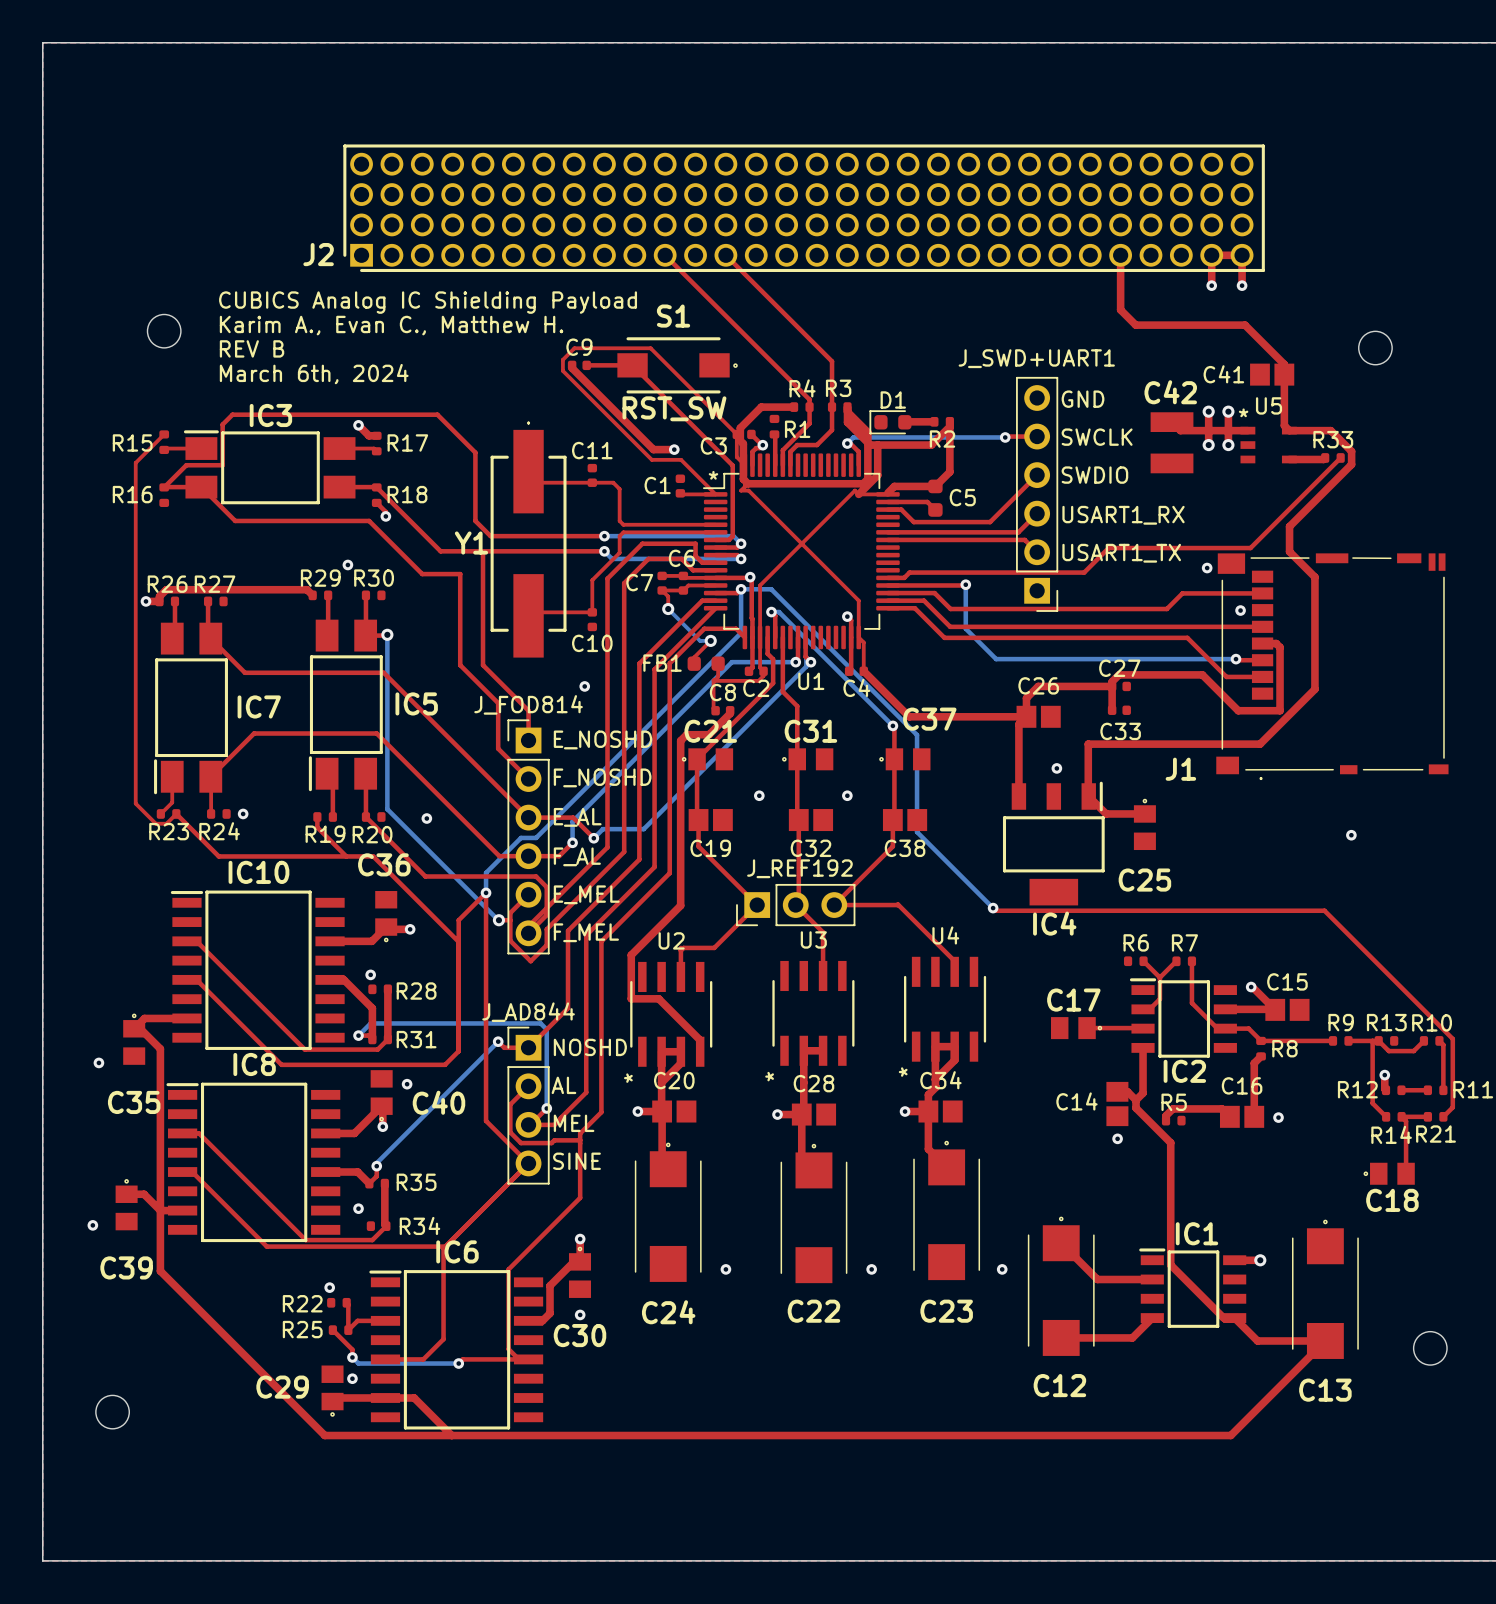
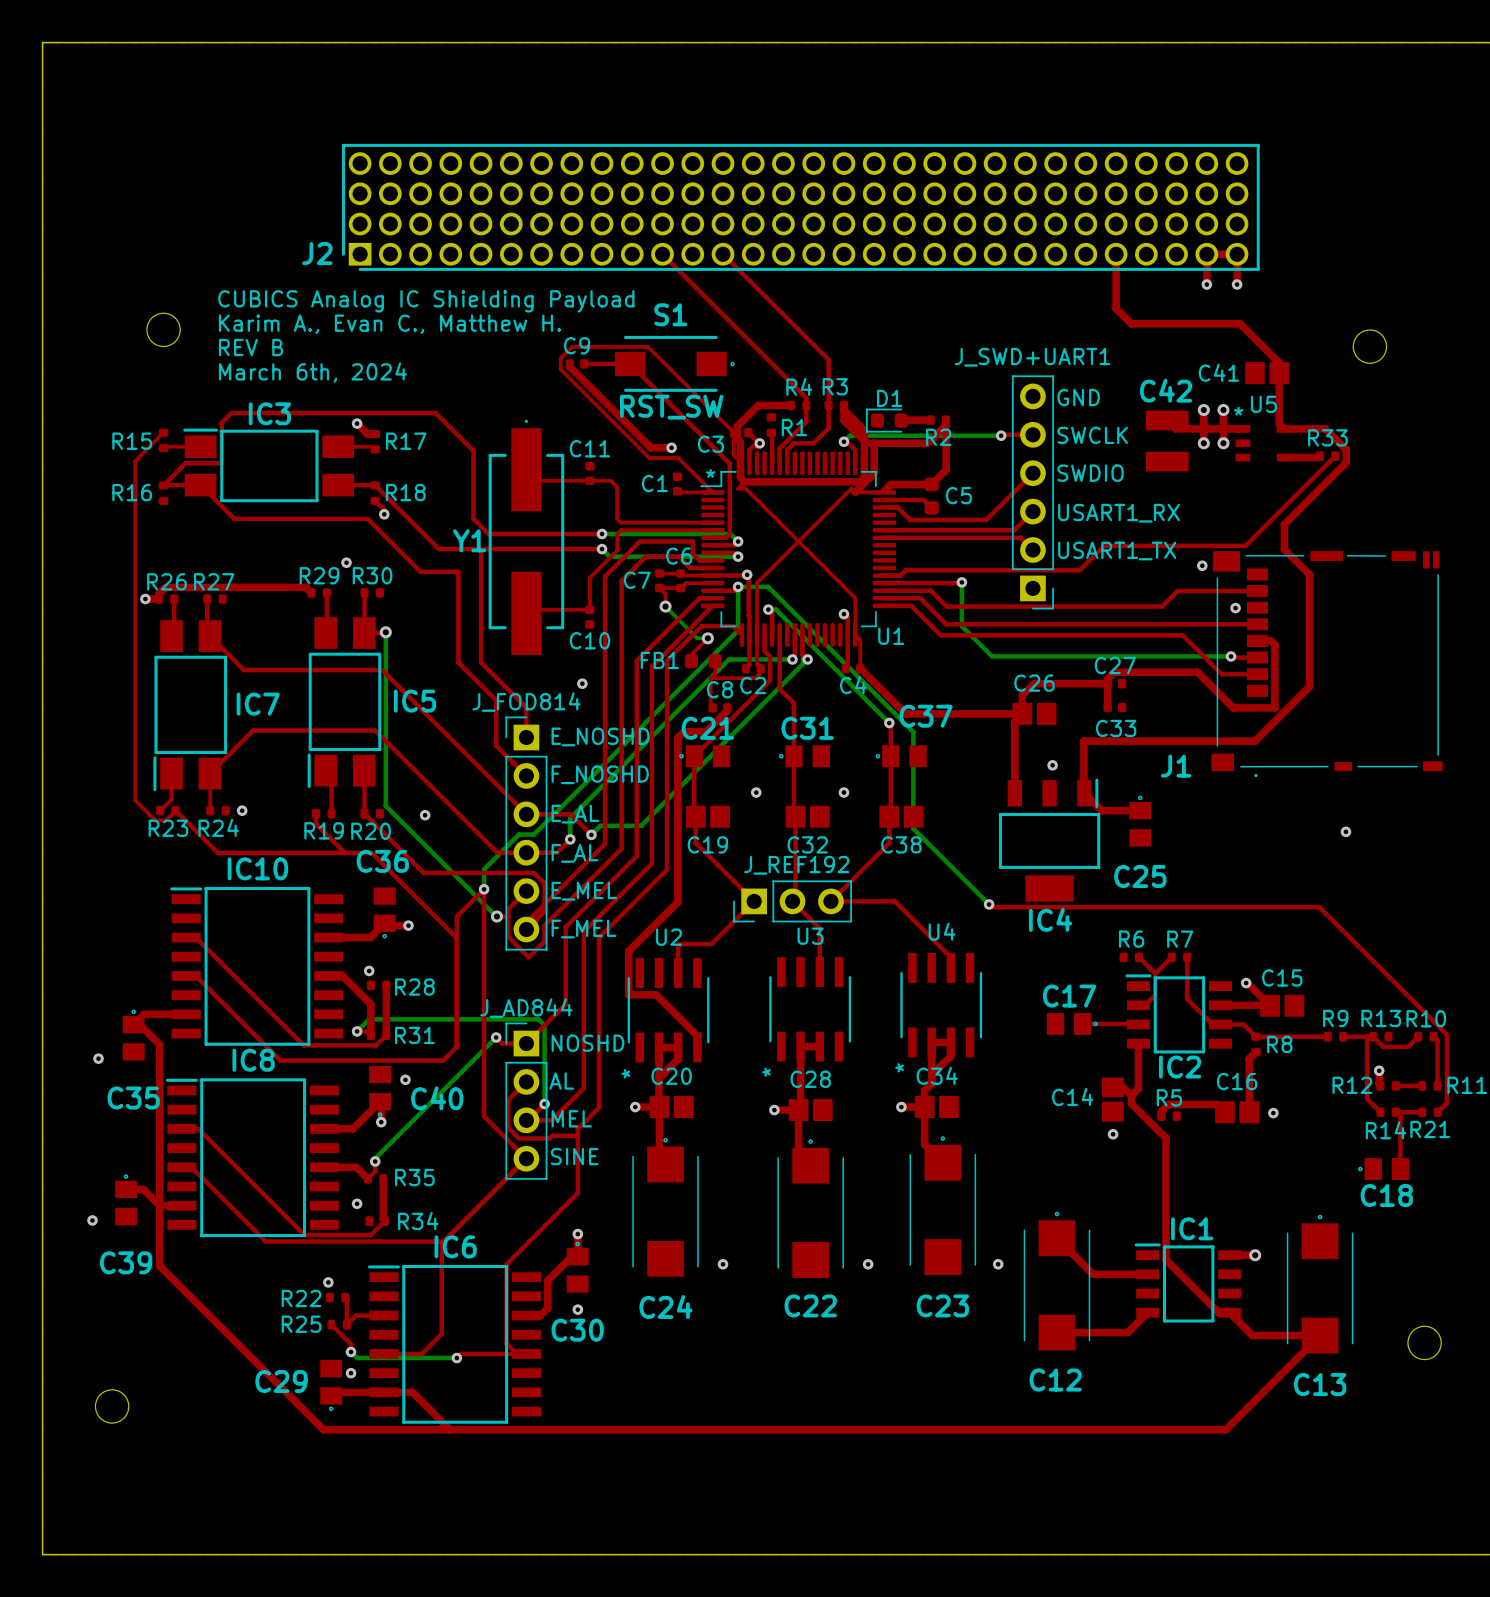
U1 name position: U1 (811, 681) -> U1 (891, 636)

